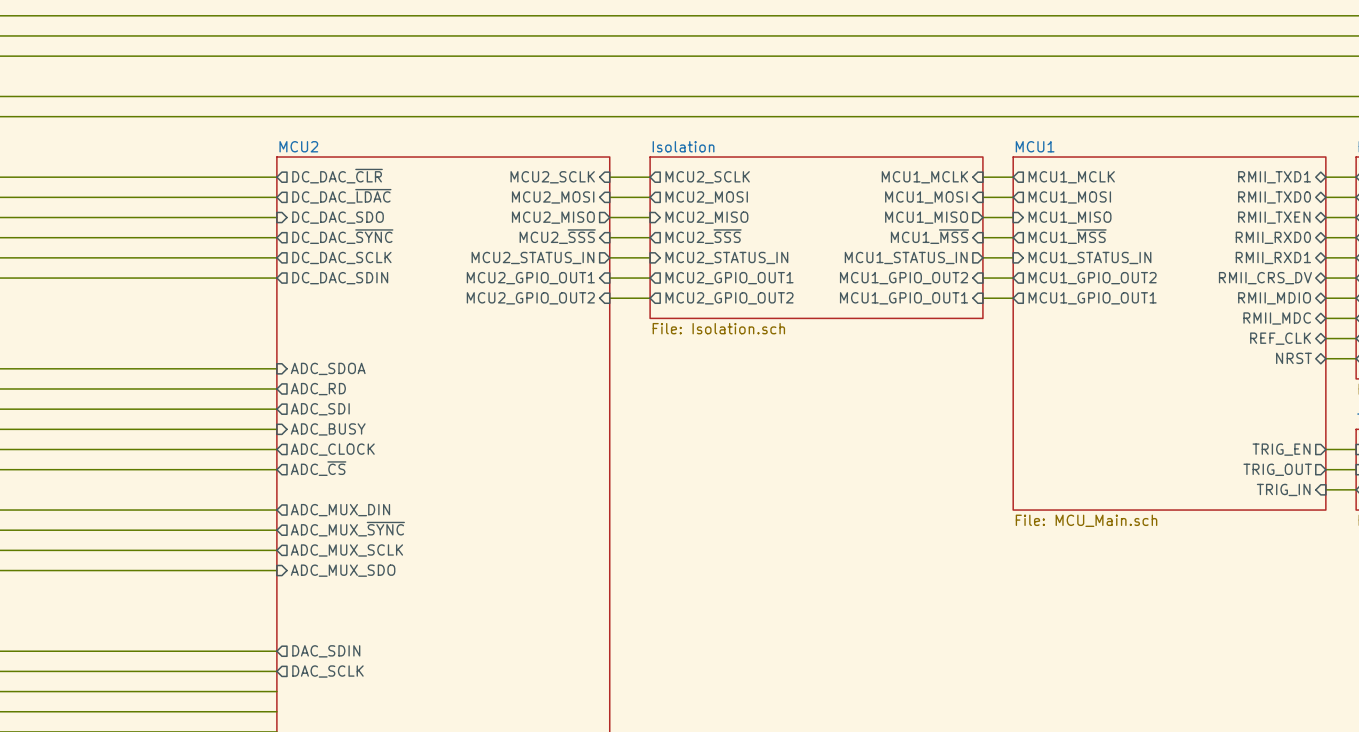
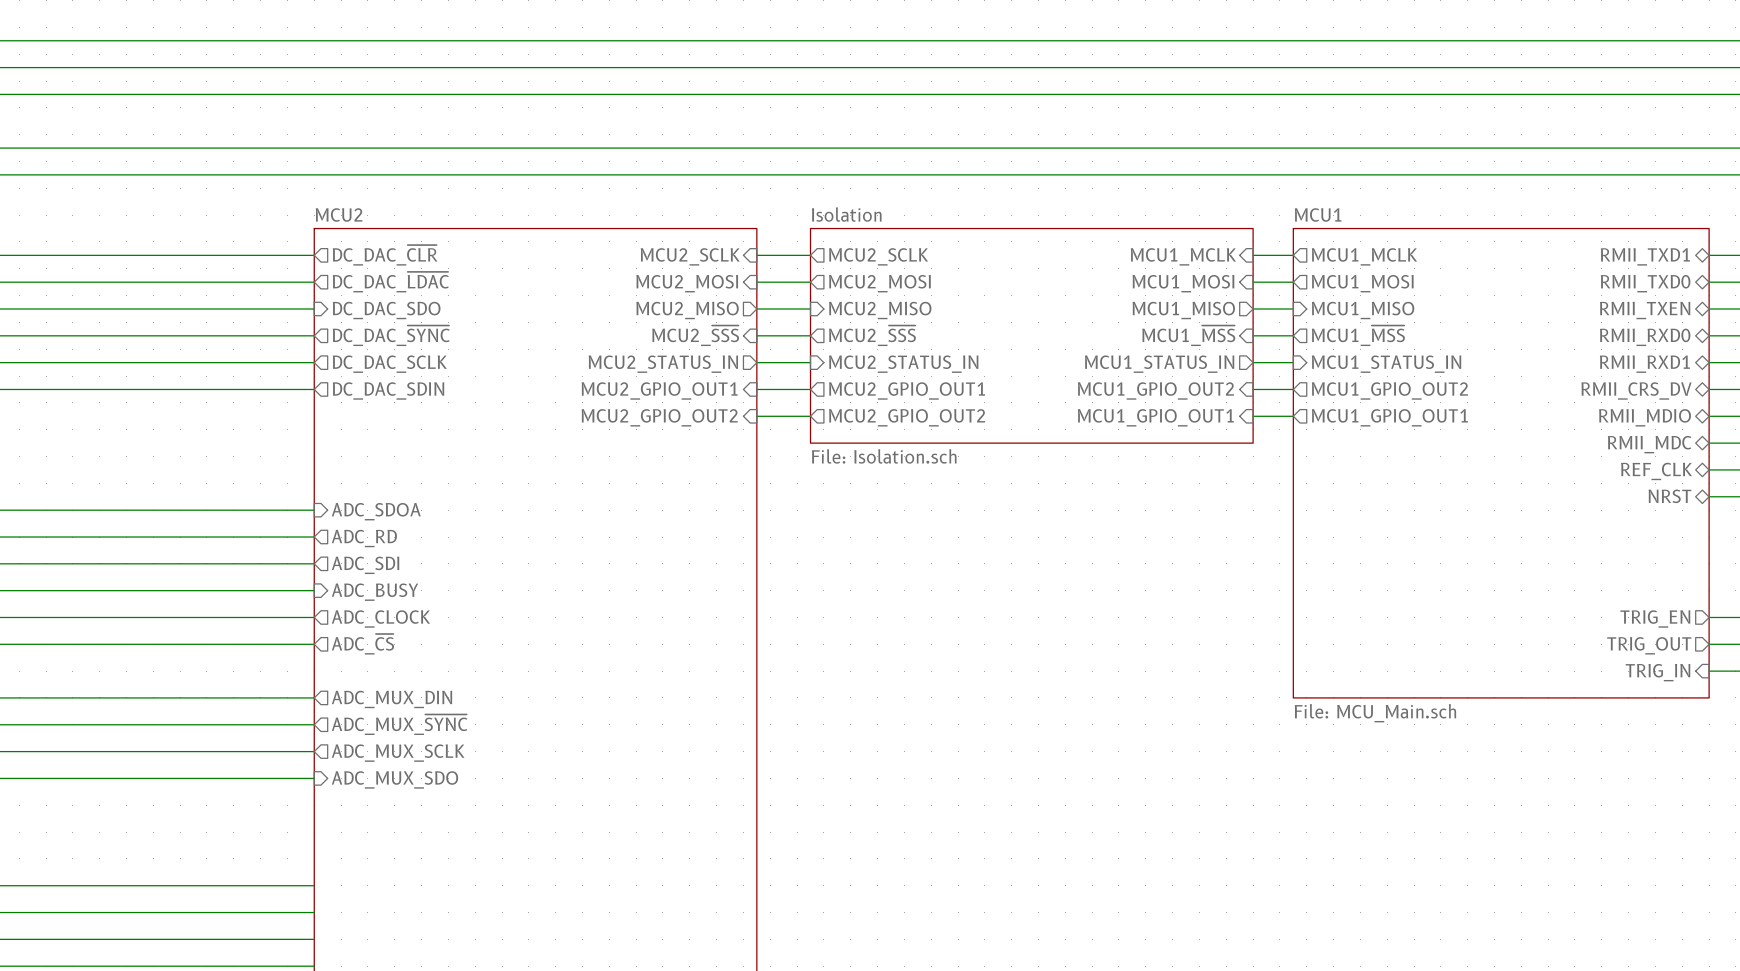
sheet pin: DAC_SDIN (326, 651) -> none
sheet pin: DAC_SCLK (327, 671) -> none

